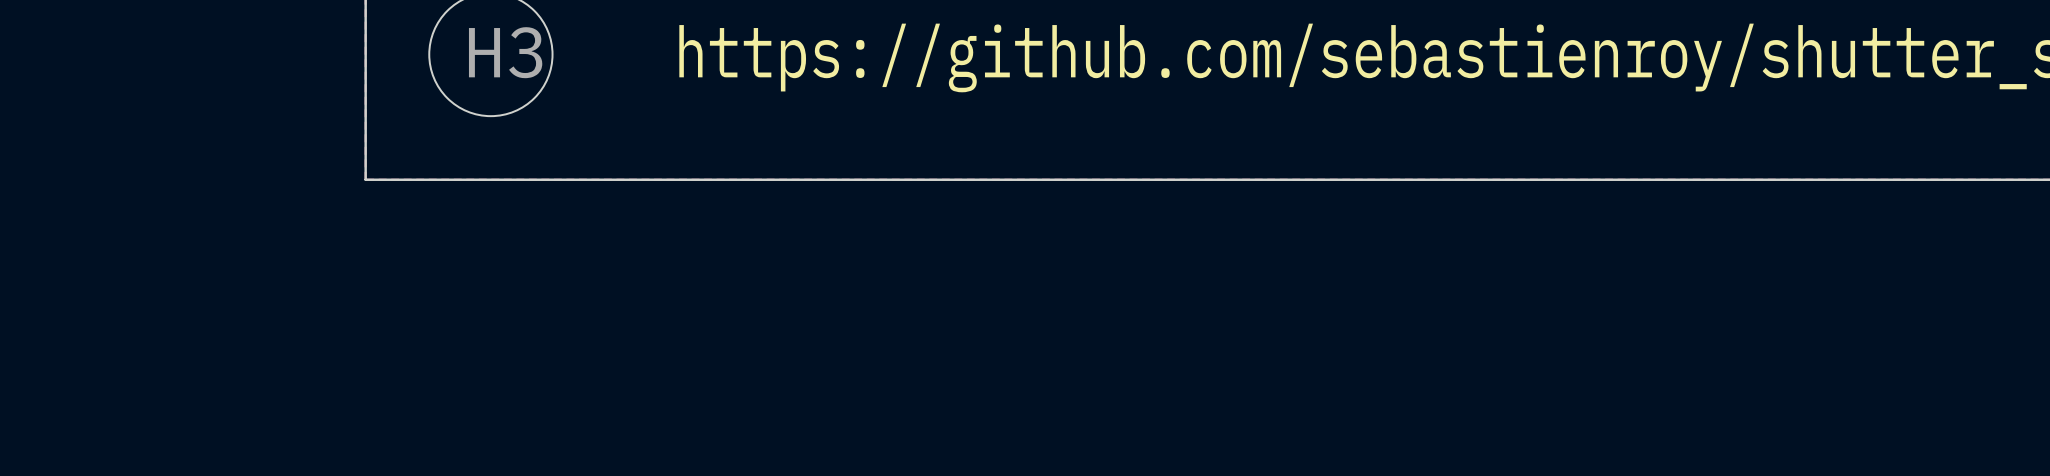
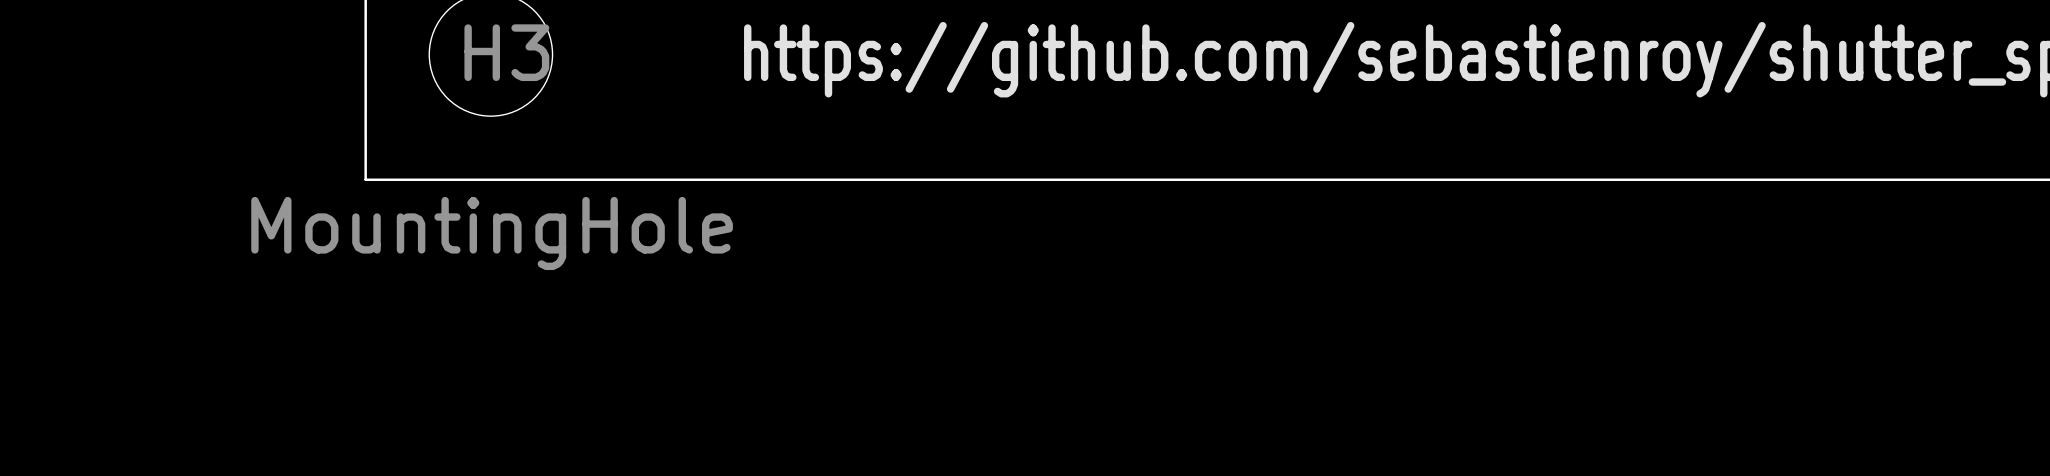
H3 value: none -> MountingHole (492, 233)

